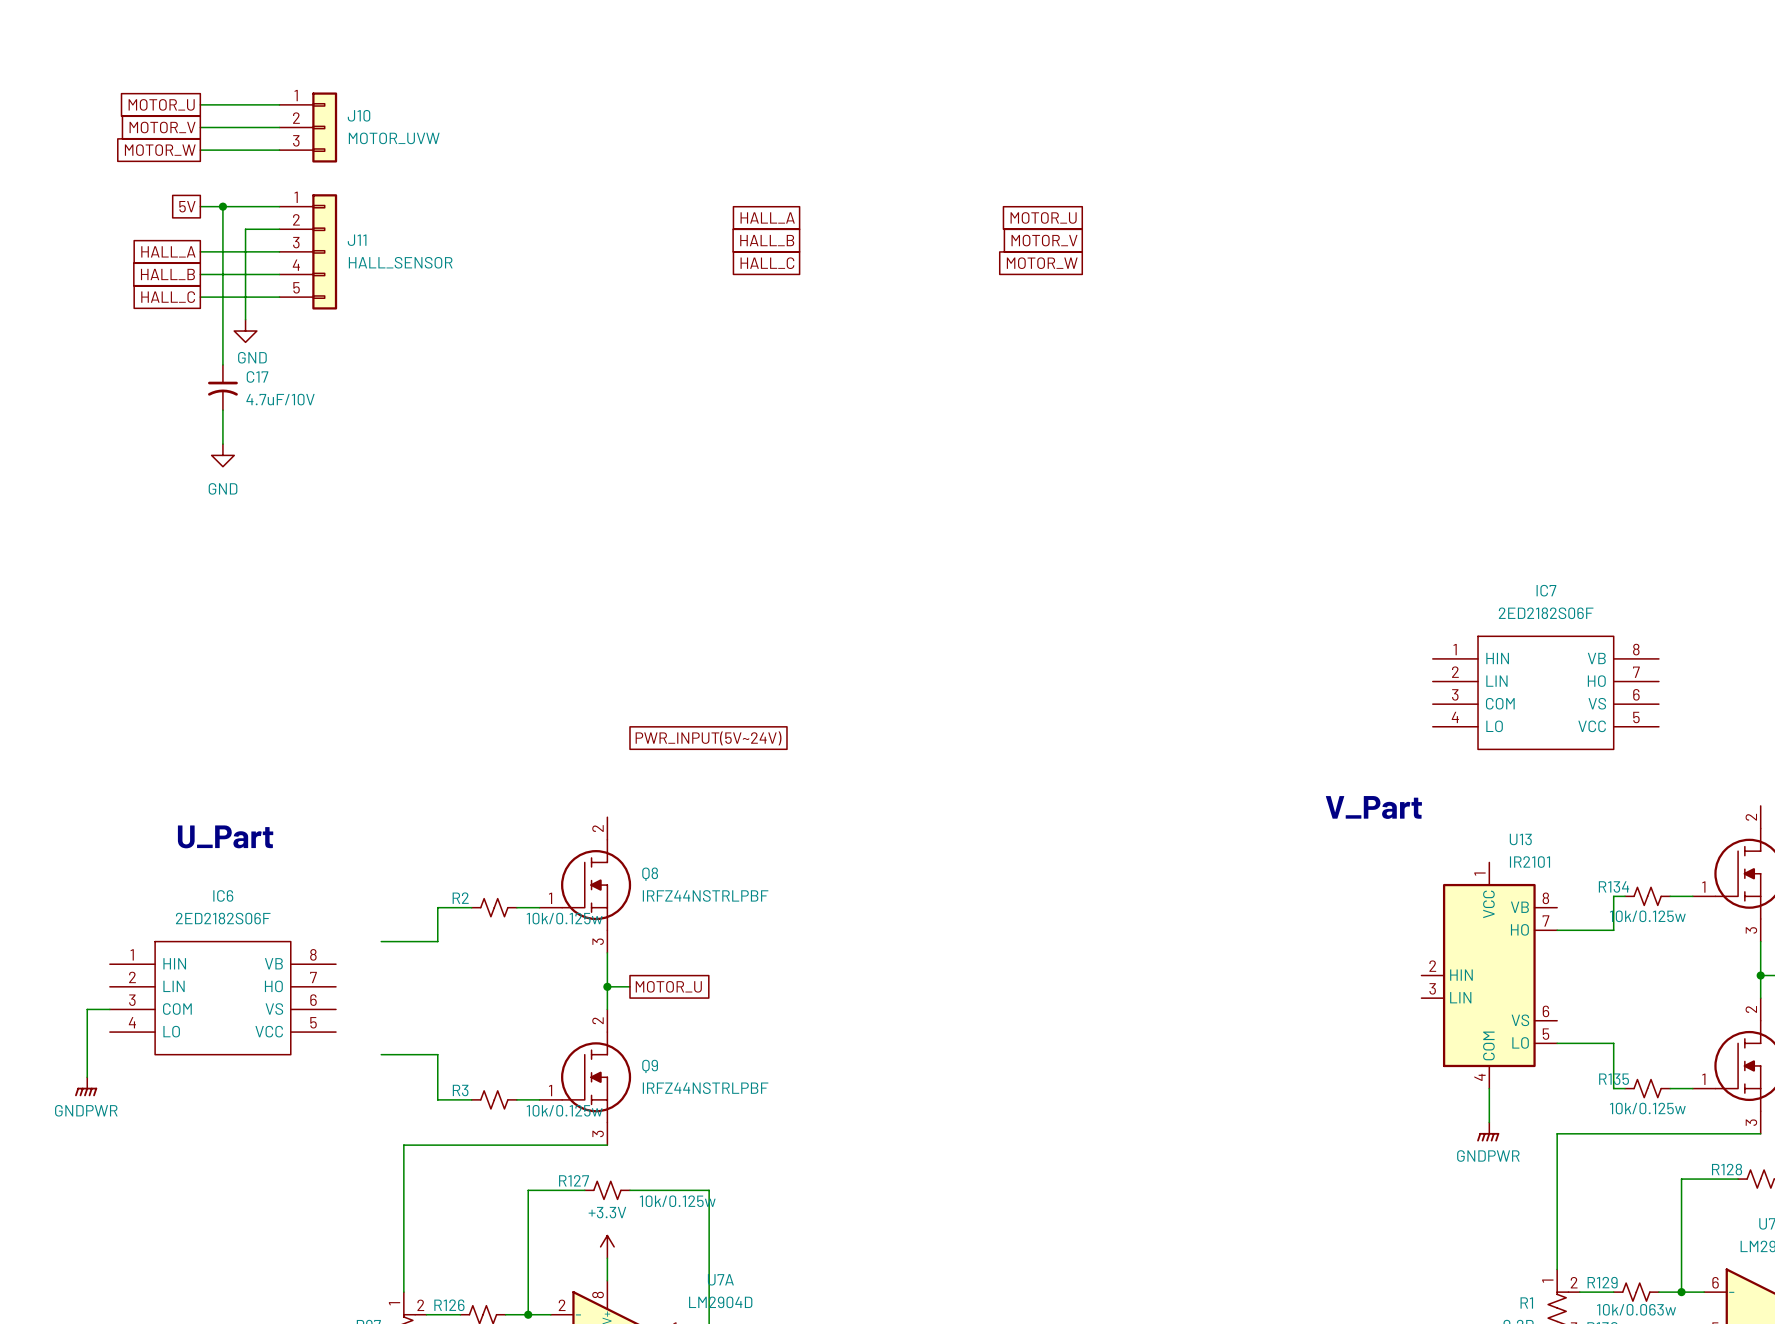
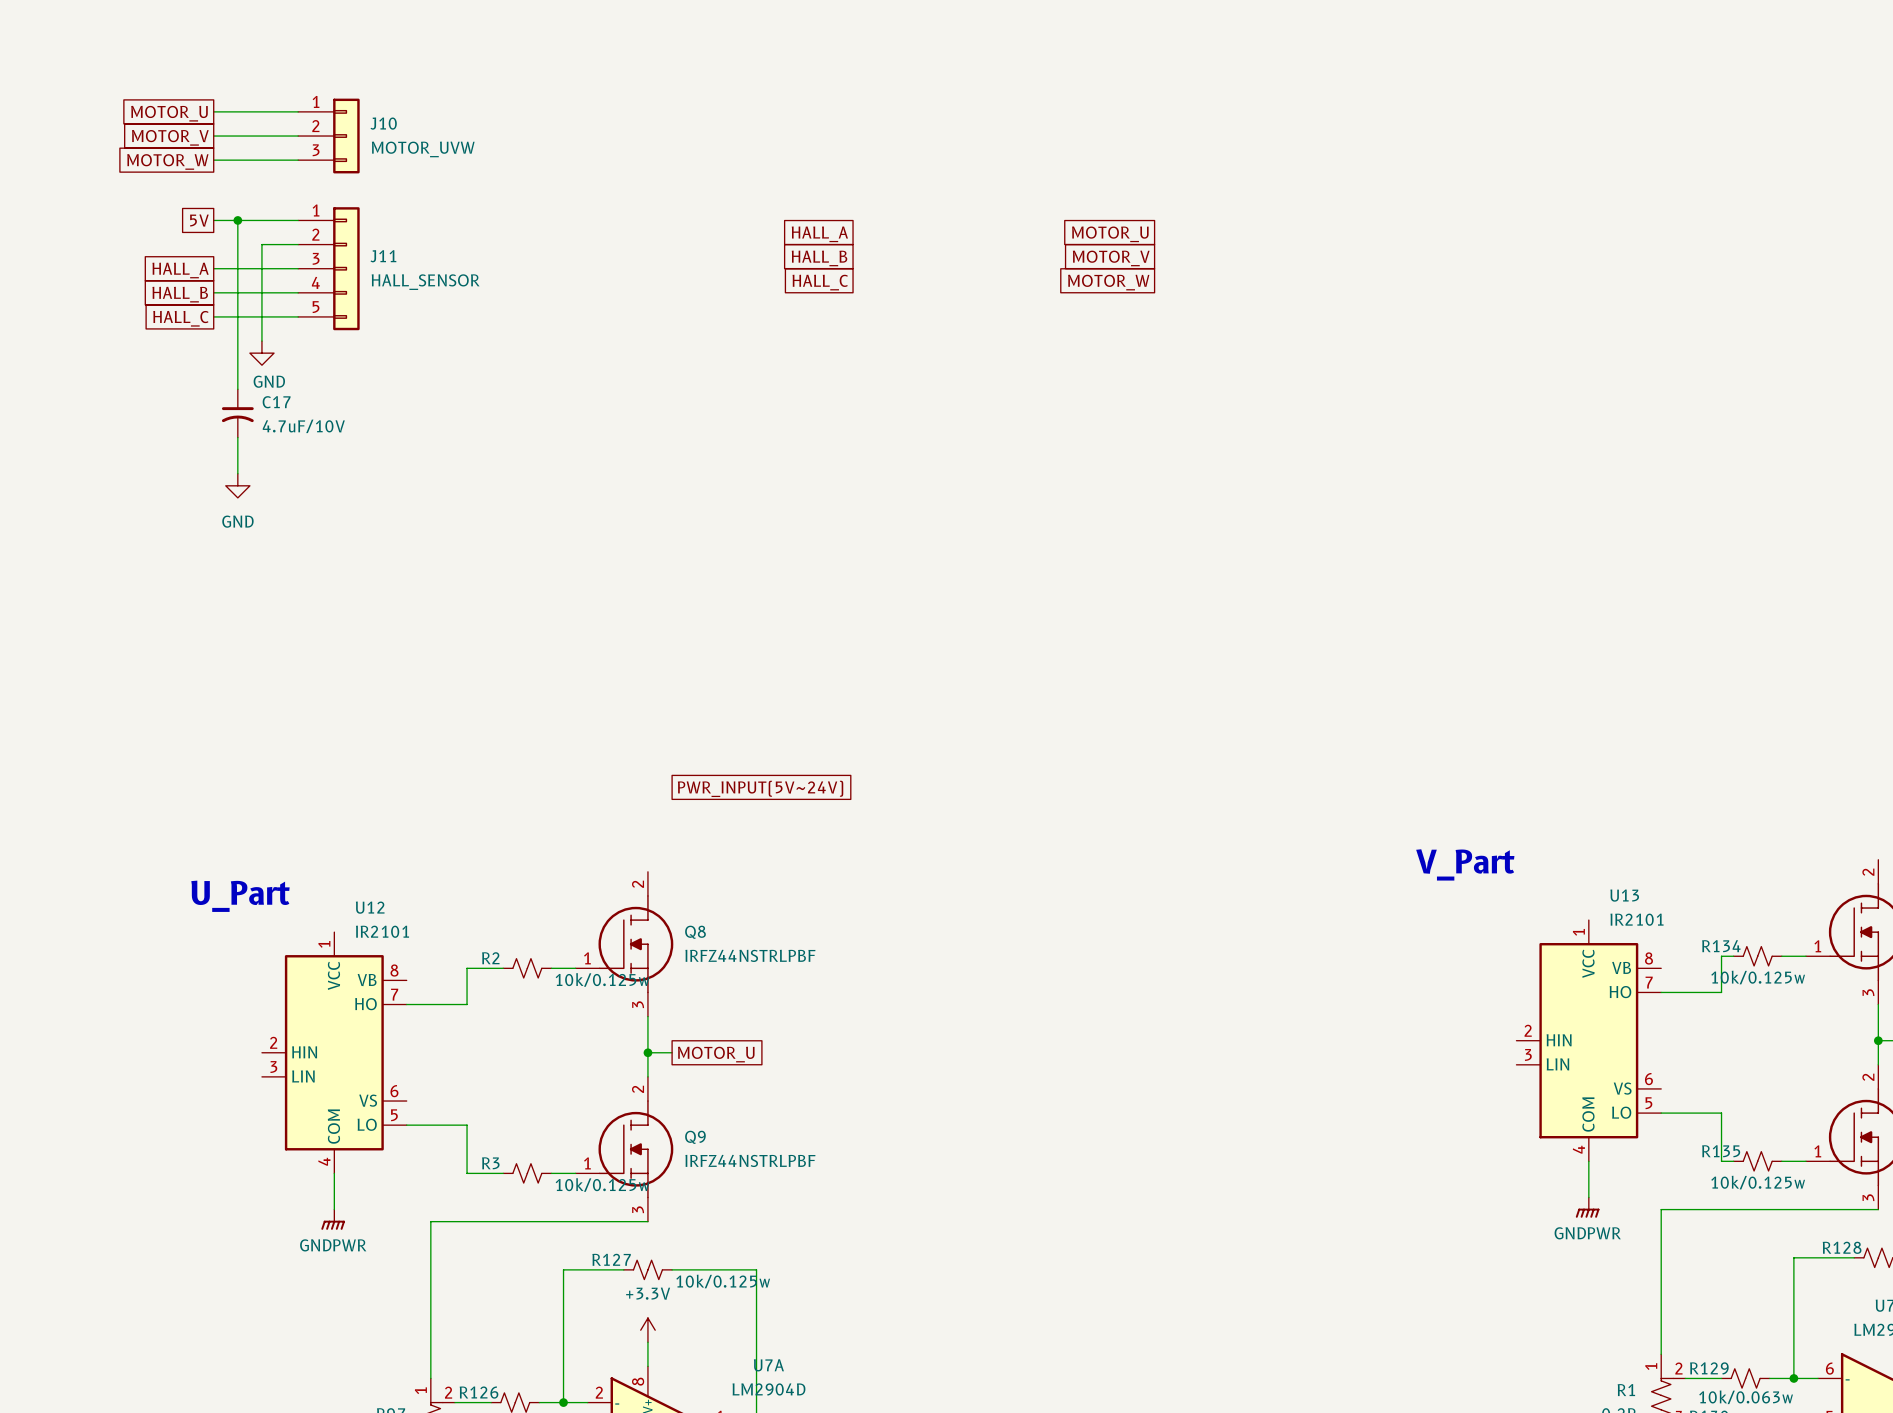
IC7: 2ED2182S06F (1545, 692) -> none
U12: none -> IR2101 (334, 1052)
IC6: 2ED2182S06F (222, 998) -> none
wire: (109, 1009) (87, 1009) (87, 1077) -> none
power symbol: GNDPWR (86, 1086) -> none
wire: none -> (334, 1173) (334, 1209)
power symbol: none -> GNDPWR (333, 1219)

